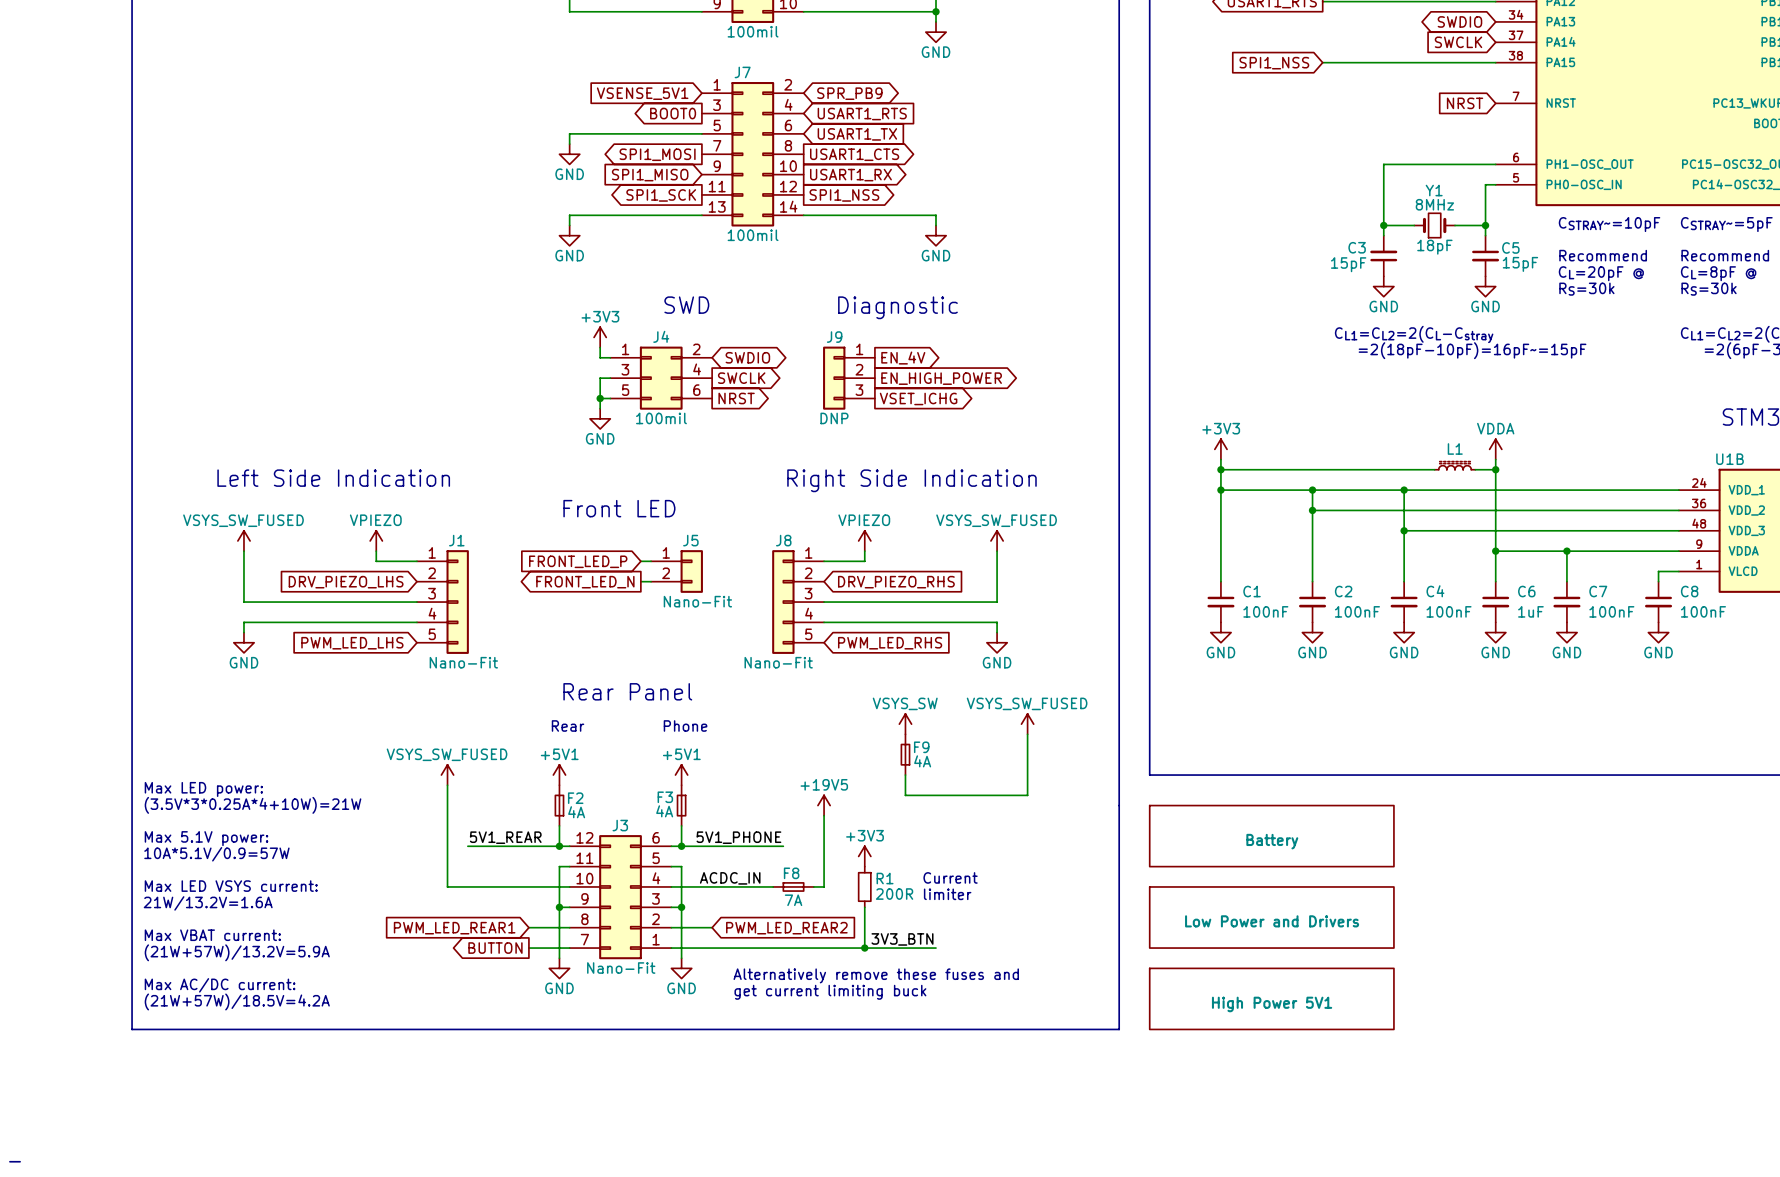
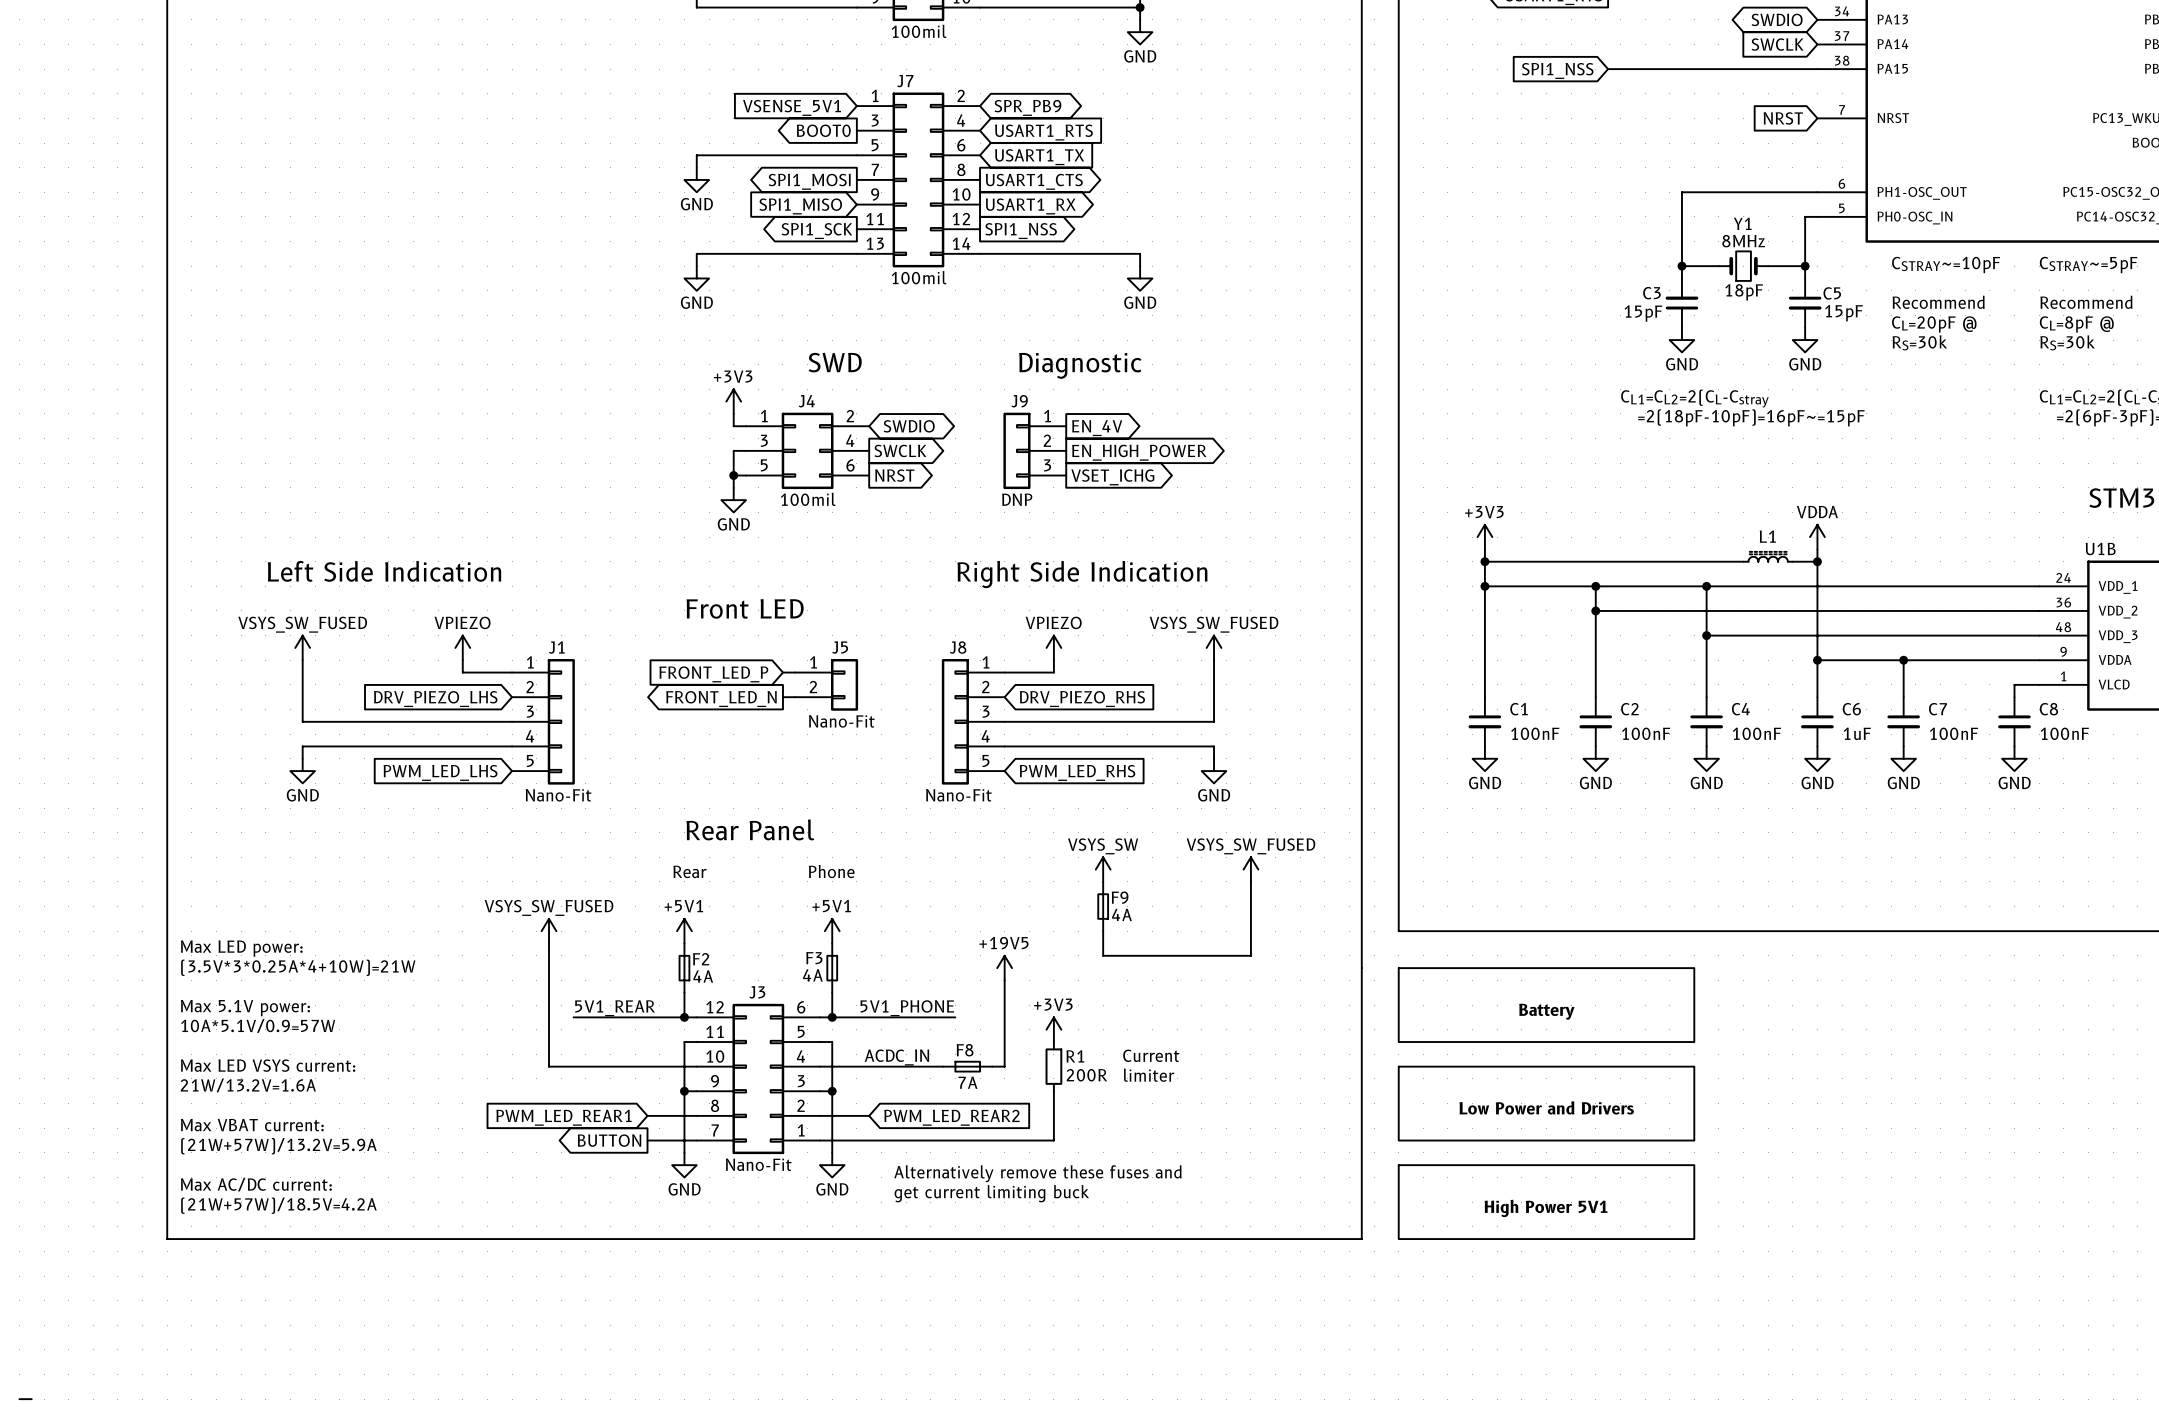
label: 3V3_BTN (902, 939) -> none
wire: (864, 948) (936, 948) -> none
junction: (864, 948) -> none

